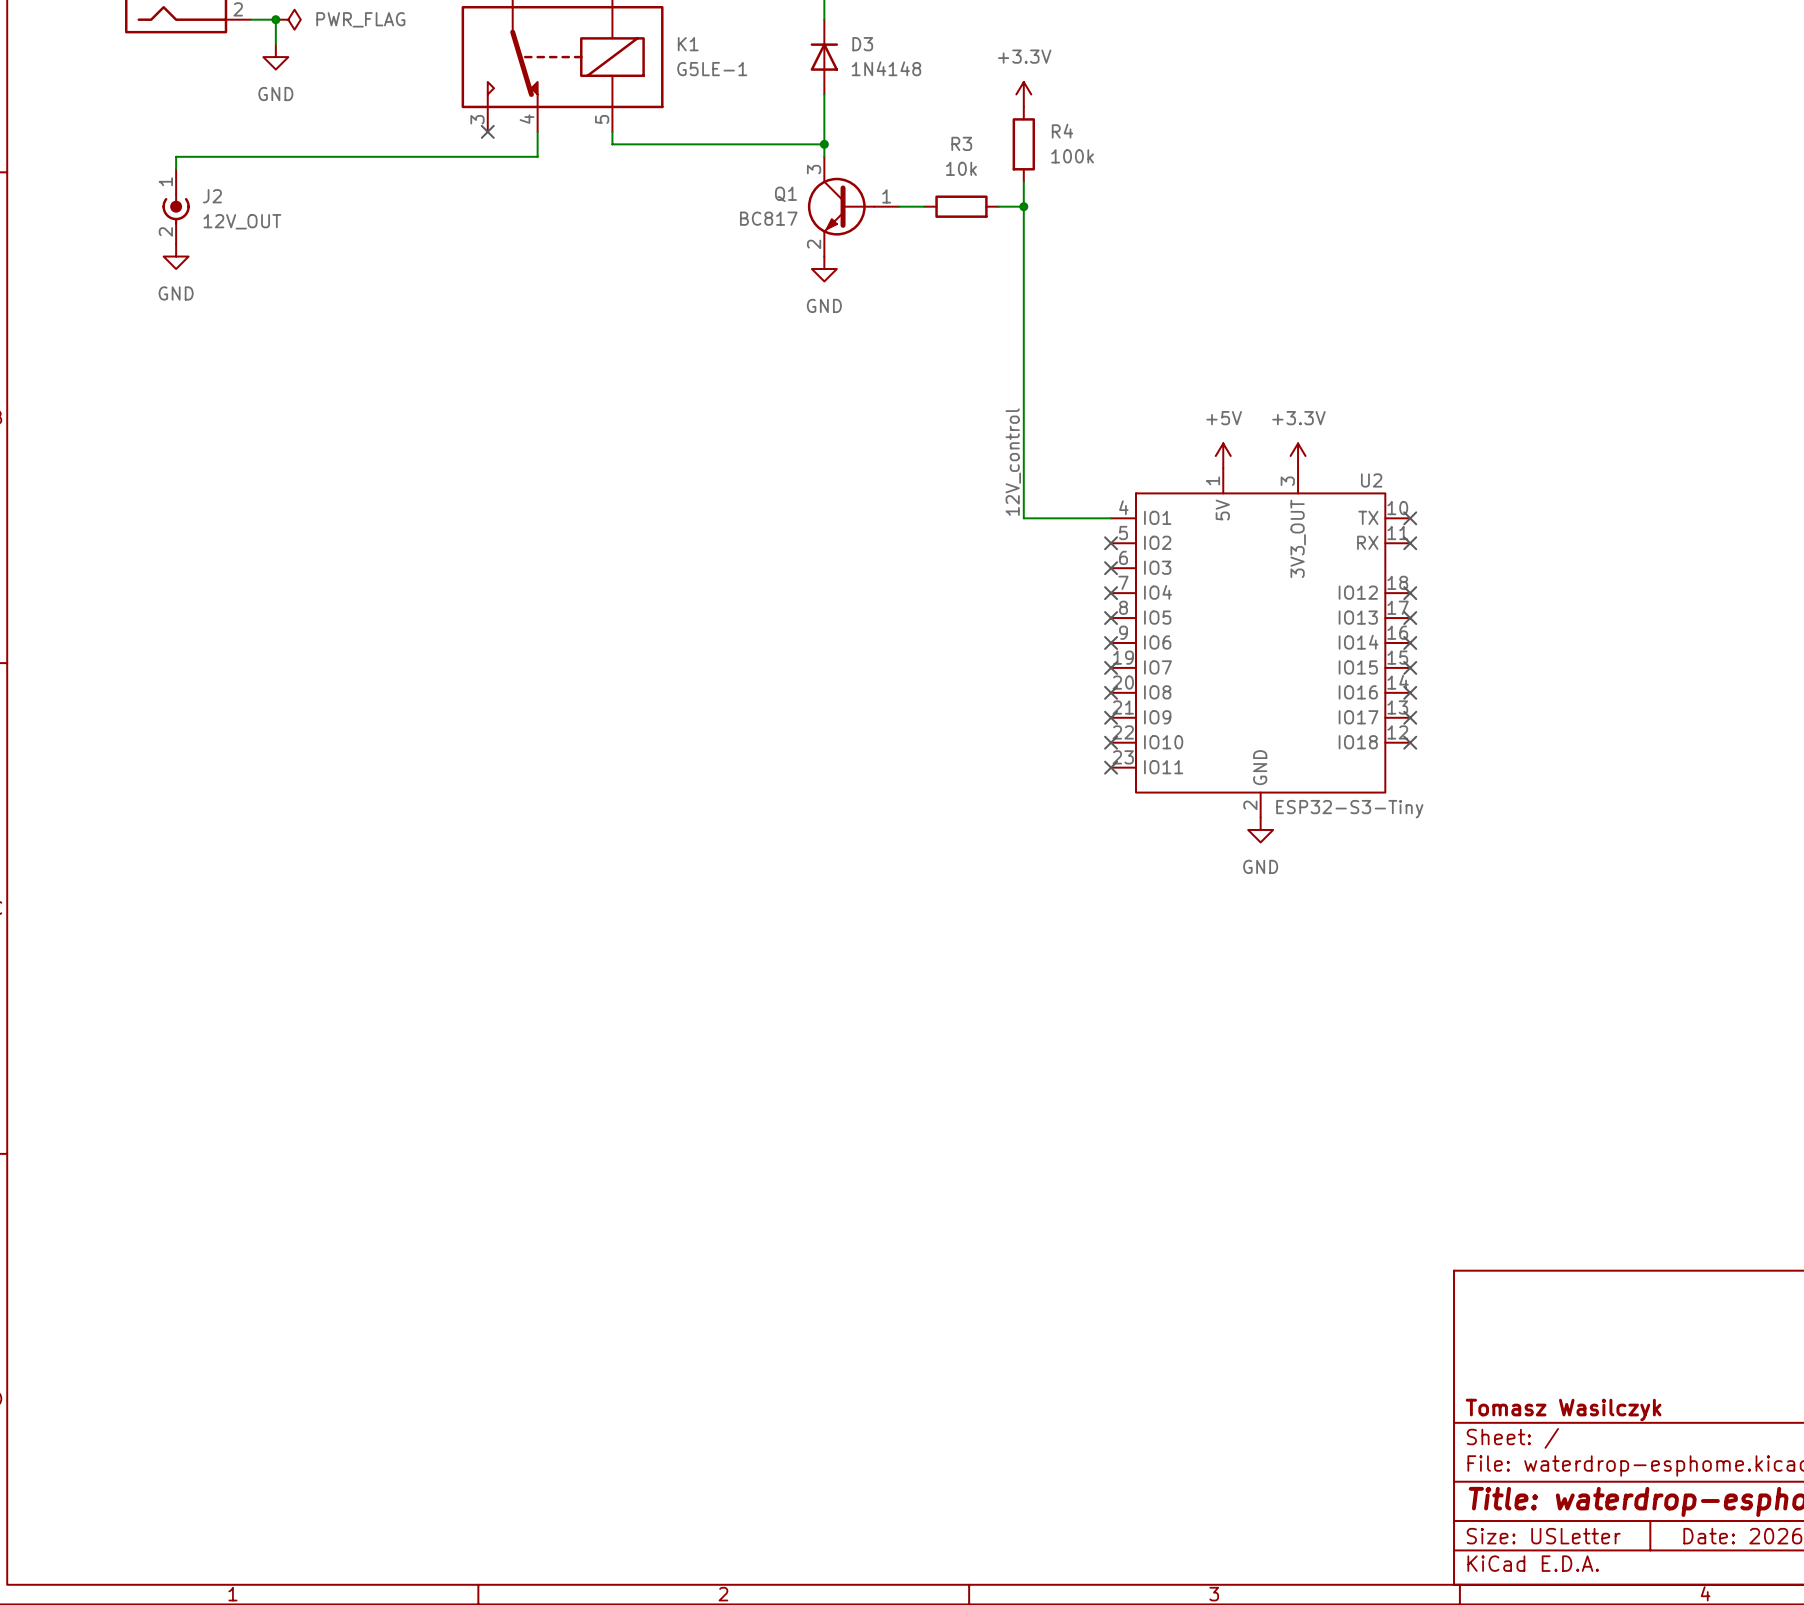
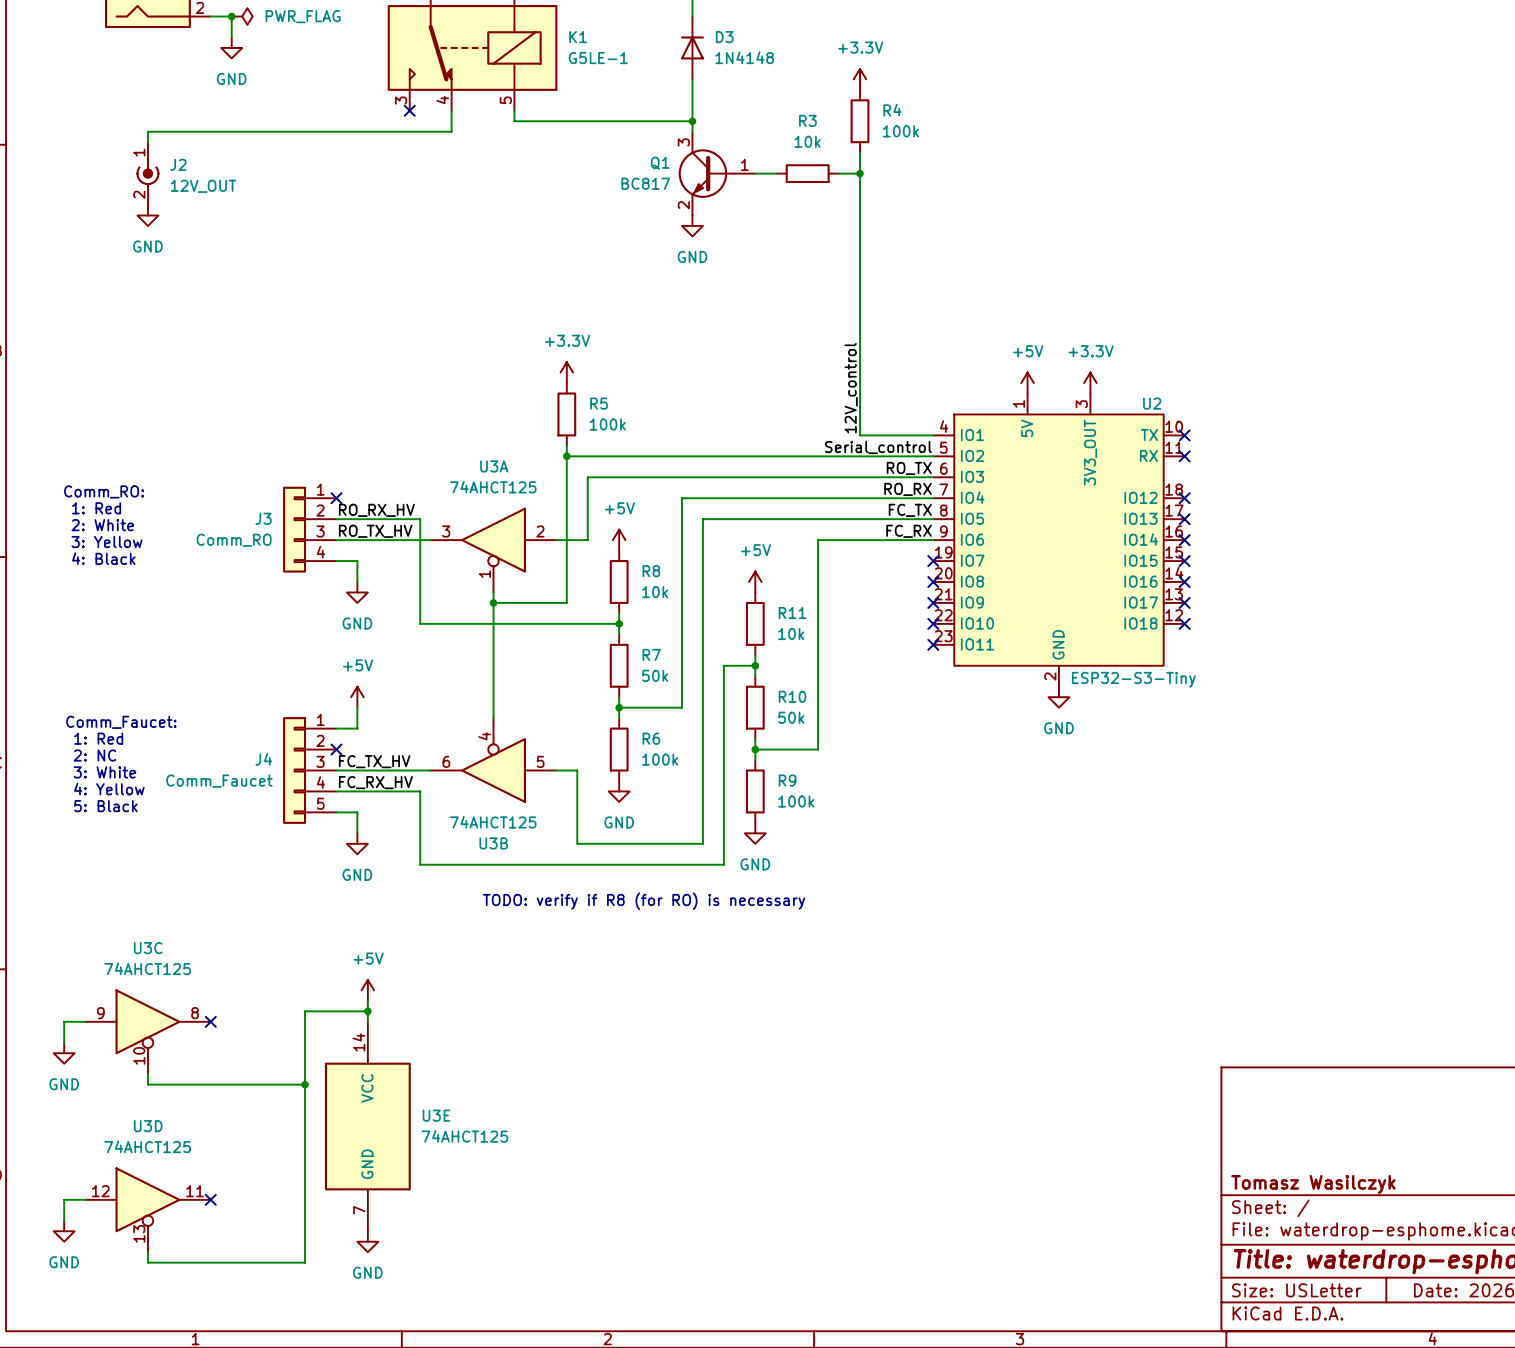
power symbol: none -> +3.3V (566, 372)
R5: none -> 100k (566, 414)
wire: none -> (566, 445) (566, 602) (493, 602)
label: none -> Serial_control (878, 447)
wire: none -> (566, 456) (933, 456)
junction: none -> (566, 456)
no-connect mark: (1111, 543) -> none
label: none -> RO_TX (909, 468)
wire: none -> (933, 477) (587, 477) (587, 540) (556, 540)
no-connect mark: (1111, 568) -> none
label: none -> RO_RX (908, 489)
text: none -> Comm_RO: (104, 491)
no-connect mark: none -> (336, 498)
wire: none -> (933, 498) (682, 498) (682, 707) (619, 707)
no-connect mark: (1111, 593) -> none
text: none -> 1: Red (96, 508)
label: none -> RO_RX_HV (376, 510)
label: none -> FC_TX (910, 510)
wire: none -> (336, 519) (420, 519) (420, 623) (619, 623)
wire: none -> (933, 519) (702, 519) (702, 843) (577, 843) (577, 770) (556, 770)
no-connect mark: (1111, 618) -> none
text: none -> 2: White (102, 525)
J3: none -> Comm_RO (309, 529)
label: none -> RO_TX_HV (375, 531)
label: none -> FC_RX (909, 531)
wire: none -> (336, 540) (430, 540)
power symbol: none -> +5V (619, 540)
wire: none -> (933, 540) (818, 540) (818, 749) (755, 749)
no-connect mark: (1111, 642) -> none
text: none -> 3: Yellow (107, 542)
U3A: none -> 74AHCT125 (493, 550)
text: none -> 4: Black (103, 558)
wire: none -> (336, 561) (357, 561) (357, 582)
R8: none -> 10k (619, 582)
power symbol: none -> +5V (755, 582)
power symbol: none -> GND (357, 592)
wire: none -> (493, 592) (493, 718)
junction: none -> (493, 602)
wire: none -> (619, 613) (619, 634)
junction: none -> (619, 623)
R11: none -> 10k (755, 623)
wire: none -> (755, 655) (755, 676)
R7: none -> 50k (619, 665)
wire: none -> (755, 665) (723, 665) (723, 864) (420, 864) (420, 791) (336, 791)
junction: none -> (755, 665)
power symbol: none -> +5V (357, 697)
wire: none -> (619, 697) (619, 718)
wire: none -> (357, 707) (357, 728) (336, 728)
junction: none -> (619, 707)
R10: none -> 50k (755, 707)
text: none -> Comm_Faucet: (121, 722)
text: none -> 1: Red (98, 738)
wire: none -> (755, 739) (755, 760)
no-connect mark: none -> (336, 749)
R6: none -> 100k (619, 749)
junction: none -> (755, 749)
text: none -> 2: NC (94, 755)
U3B: none -> 74AHCT125 (493, 760)
label: none -> FC_TX_HV (374, 761)
J4: none -> Comm_Faucet (309, 770)
wire: none -> (336, 770) (430, 770)
text: none -> 3: White (104, 772)
label: none -> FC_RX_HV (375, 782)
text: none -> 4: Yellow (109, 789)
power symbol: none -> GND (619, 791)
R9: none -> 100k (755, 791)
text: none -> 5: Black (105, 806)
wire: none -> (336, 812) (357, 812) (357, 833)
power symbol: none -> GND (755, 833)
power symbol: none -> GND (357, 843)
text: none -> TODO: verify if R8 (for RO) is necessary (644, 901)
power symbol: none -> +5V (367, 990)
wire: none -> (367, 1000) (367, 1021)
wire: none -> (367, 1011) (305, 1011) (305, 1262) (147, 1262) (147, 1252)
junction: none -> (367, 1011)
wire: none -> (85, 1021) (64, 1021) (64, 1042)
no-connect mark: none -> (210, 1021)
U3C: none -> 74AHCT125 (147, 1031)
power symbol: none -> GND (64, 1053)
wire: none -> (147, 1074) (147, 1084) (305, 1084)
junction: none -> (305, 1084)
U3E: none -> 74AHCT125 (367, 1126)
wire: none -> (85, 1199) (64, 1199) (64, 1220)
no-connect mark: none -> (210, 1199)
U3D: none -> 74AHCT125 (147, 1209)
power symbol: none -> GND (64, 1231)
power symbol: none -> GND (367, 1241)

